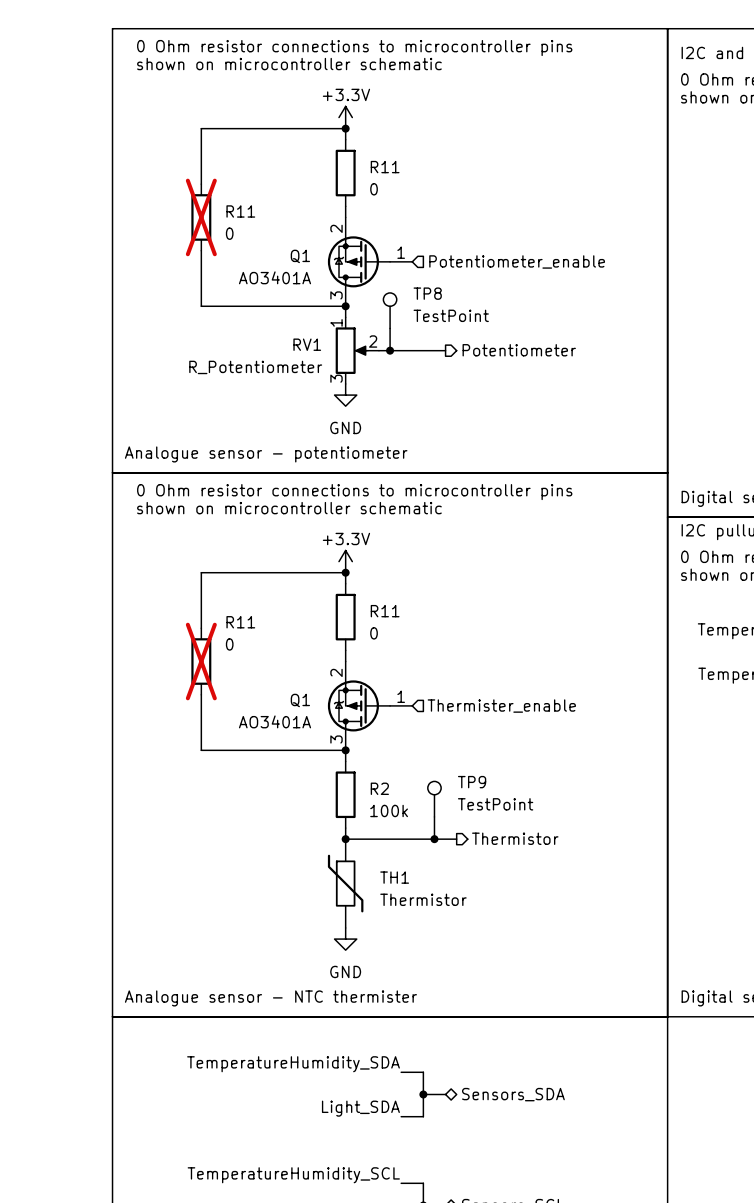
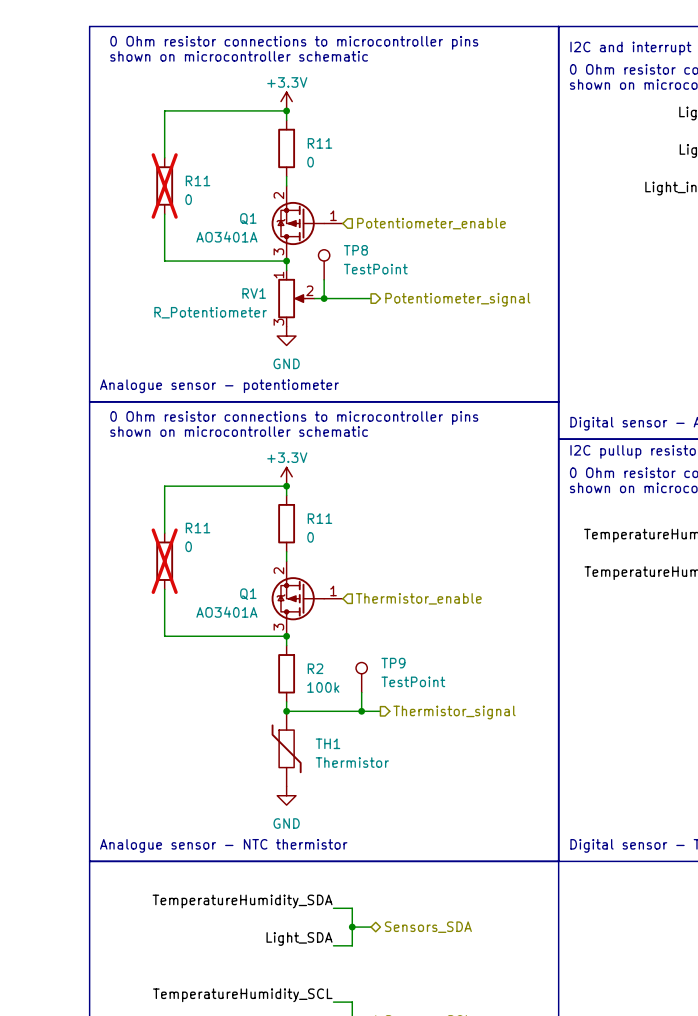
hierarchical label: Potentiometer (519, 350) -> Potentiometer_signal (457, 299)
hierarchical label: Thermister_enable (501, 706) -> Thermistor_enable (418, 598)
hierarchical label: Thermistor (515, 838) -> Thermistor_signal (454, 712)
text: Analogue sensor - NTC thermister (270, 998) -> Analogue sensor - NTC thermistor (223, 845)

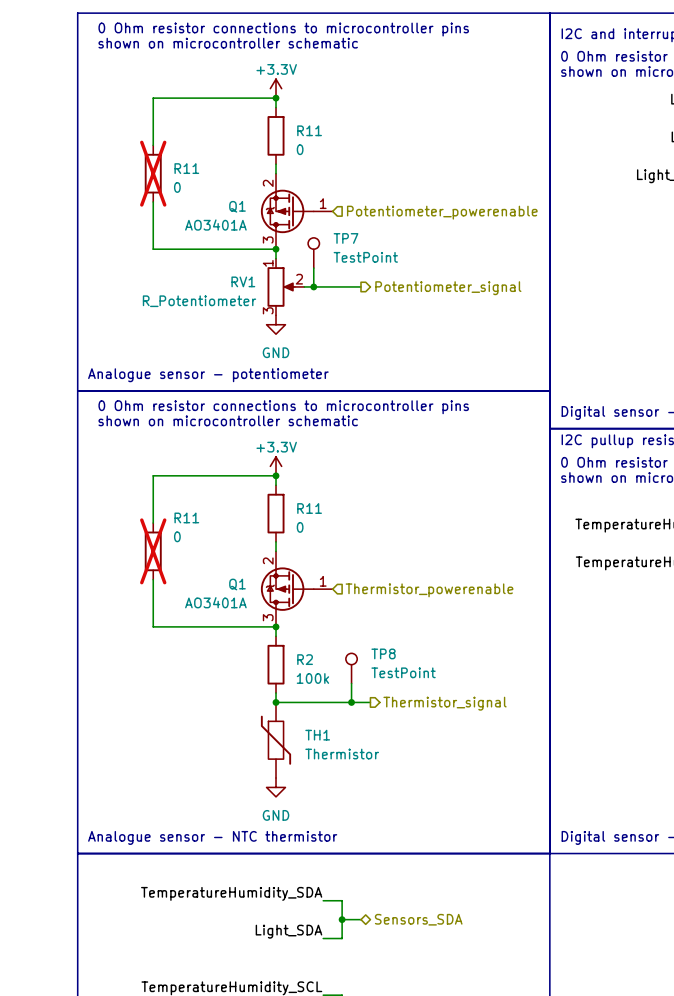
hierarchical label: Potentiometer_enable (431, 223) -> Potentiometer_powerenable (442, 212)
TP8 name: TP8 (355, 250) -> TP7 (346, 238)
hierarchical label: Thermistor_enable (418, 598) -> Thermistor_powerenable (429, 590)
TP9 name: TP9 (393, 663) -> TP8 (383, 653)

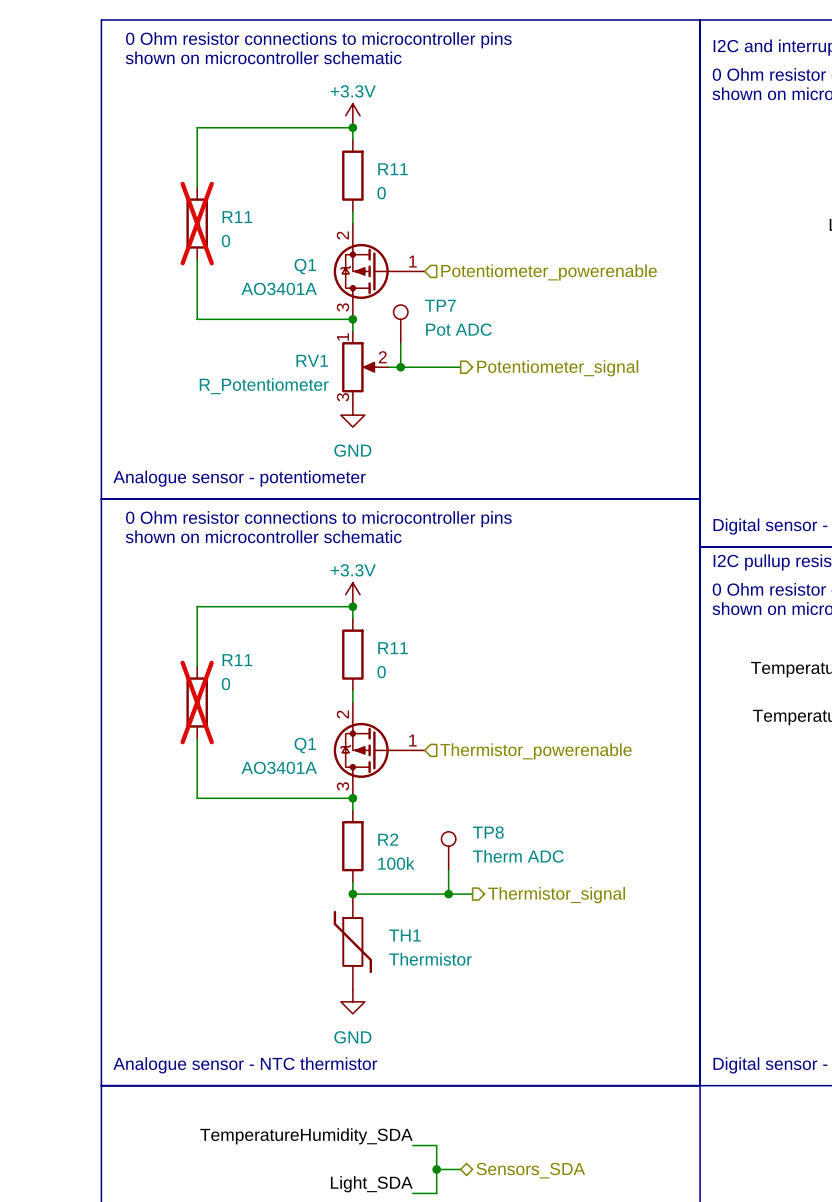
TP7 value: TestPoint (365, 257) -> Pot ADC (458, 329)
TP8 value: TestPoint (403, 672) -> Therm ADC (518, 856)

